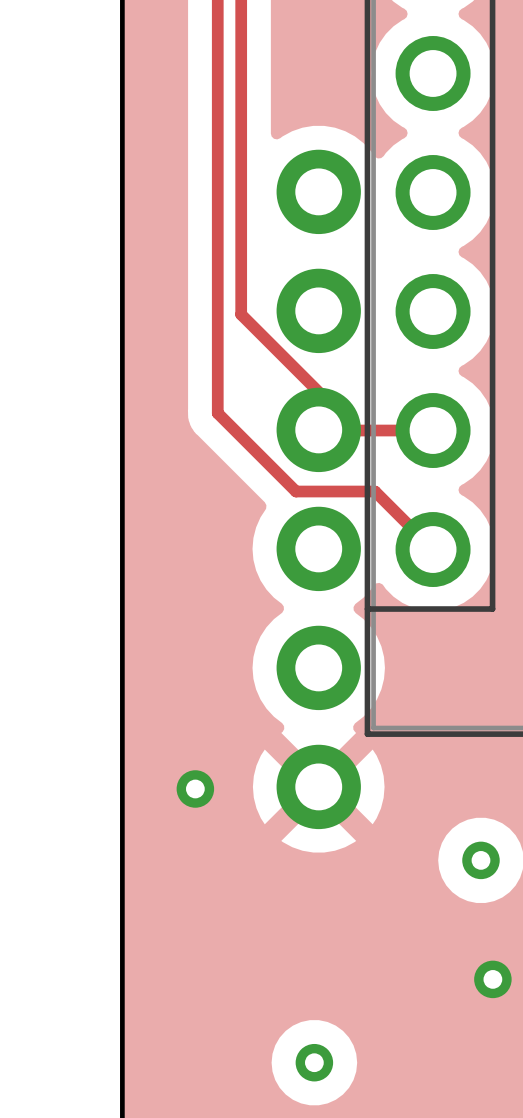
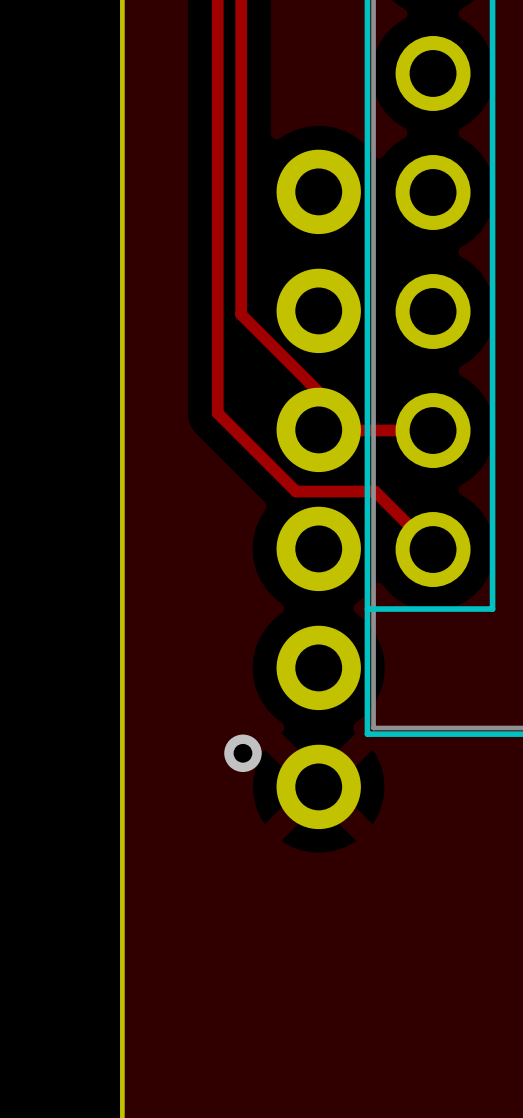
via position: (195, 788) -> (242, 753)
via: (480, 860) -> none
via: (492, 979) -> none
via: (314, 1062) -> none

